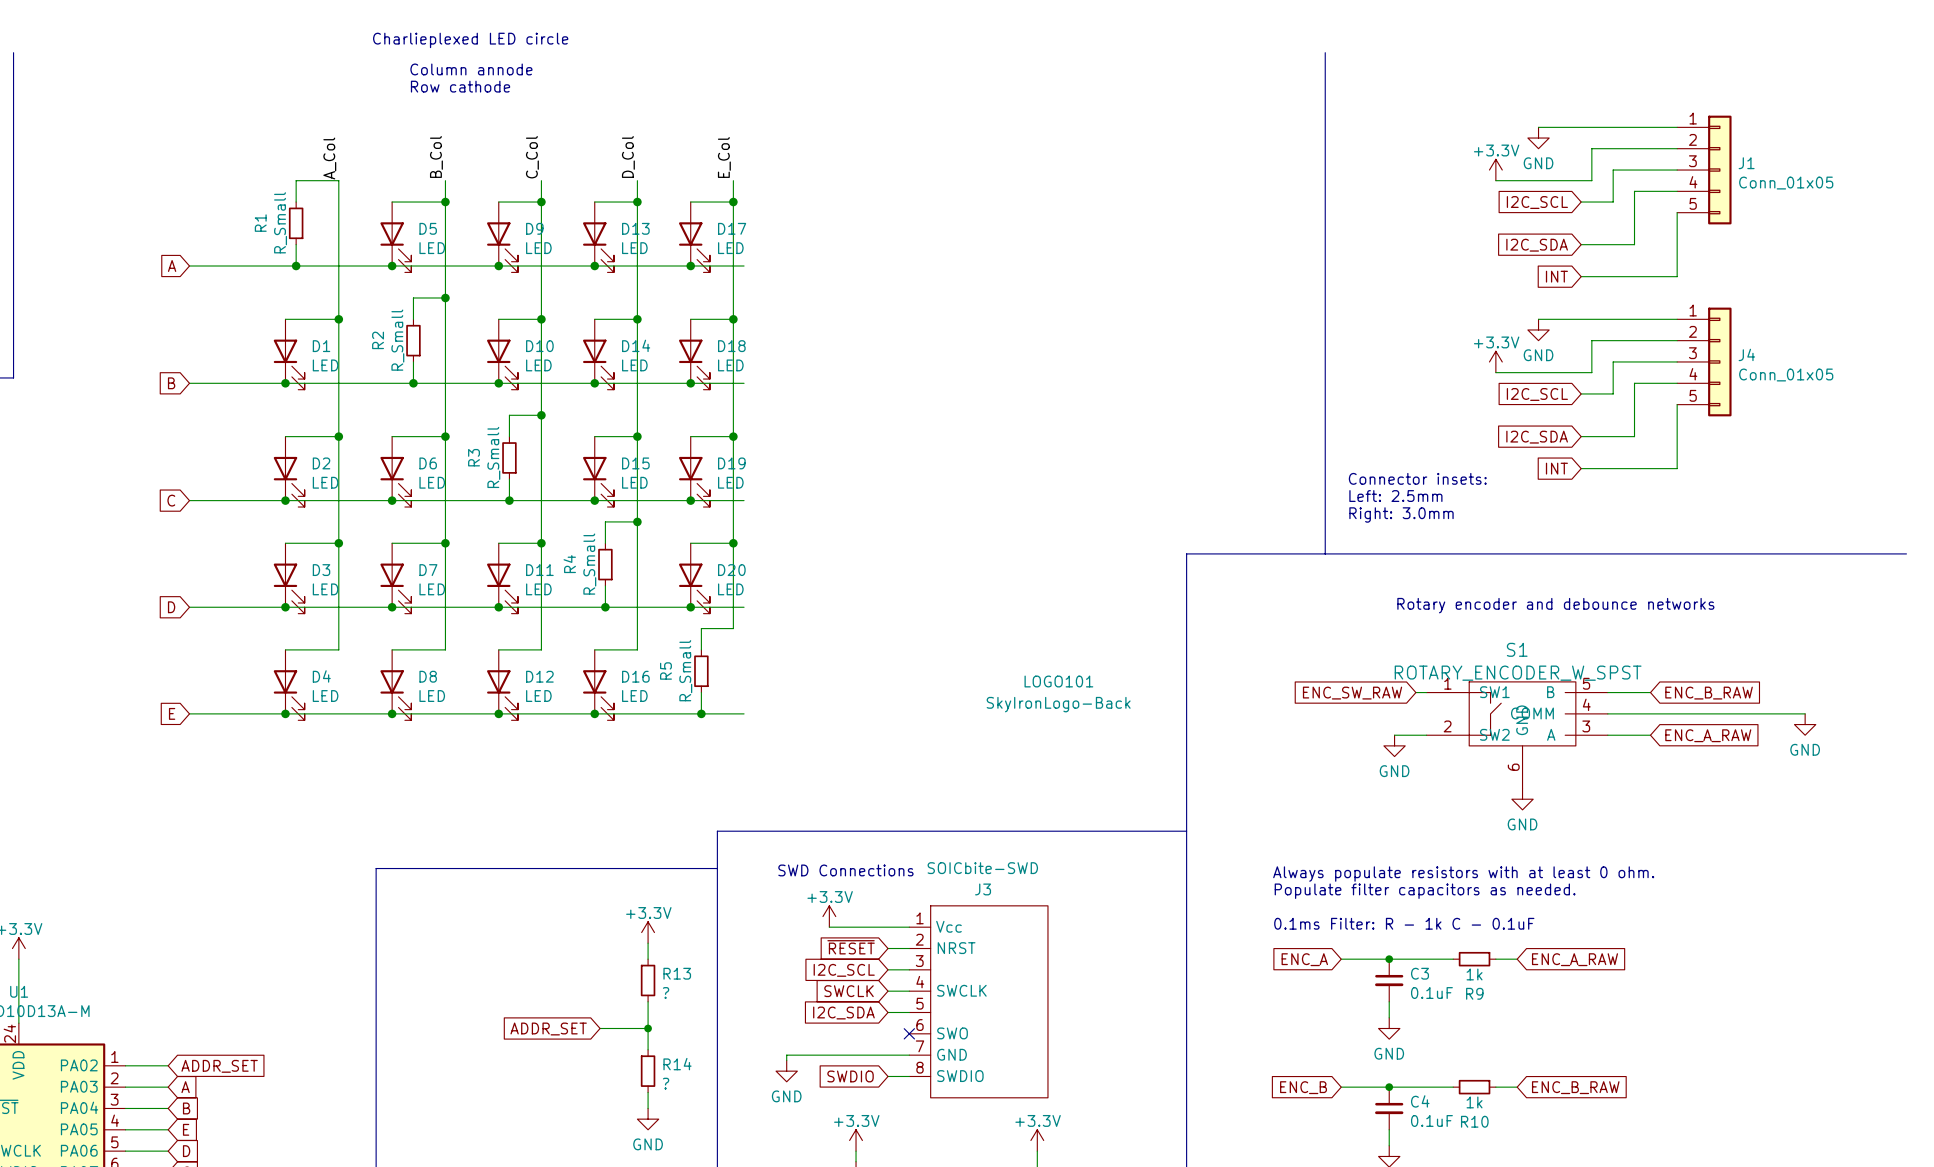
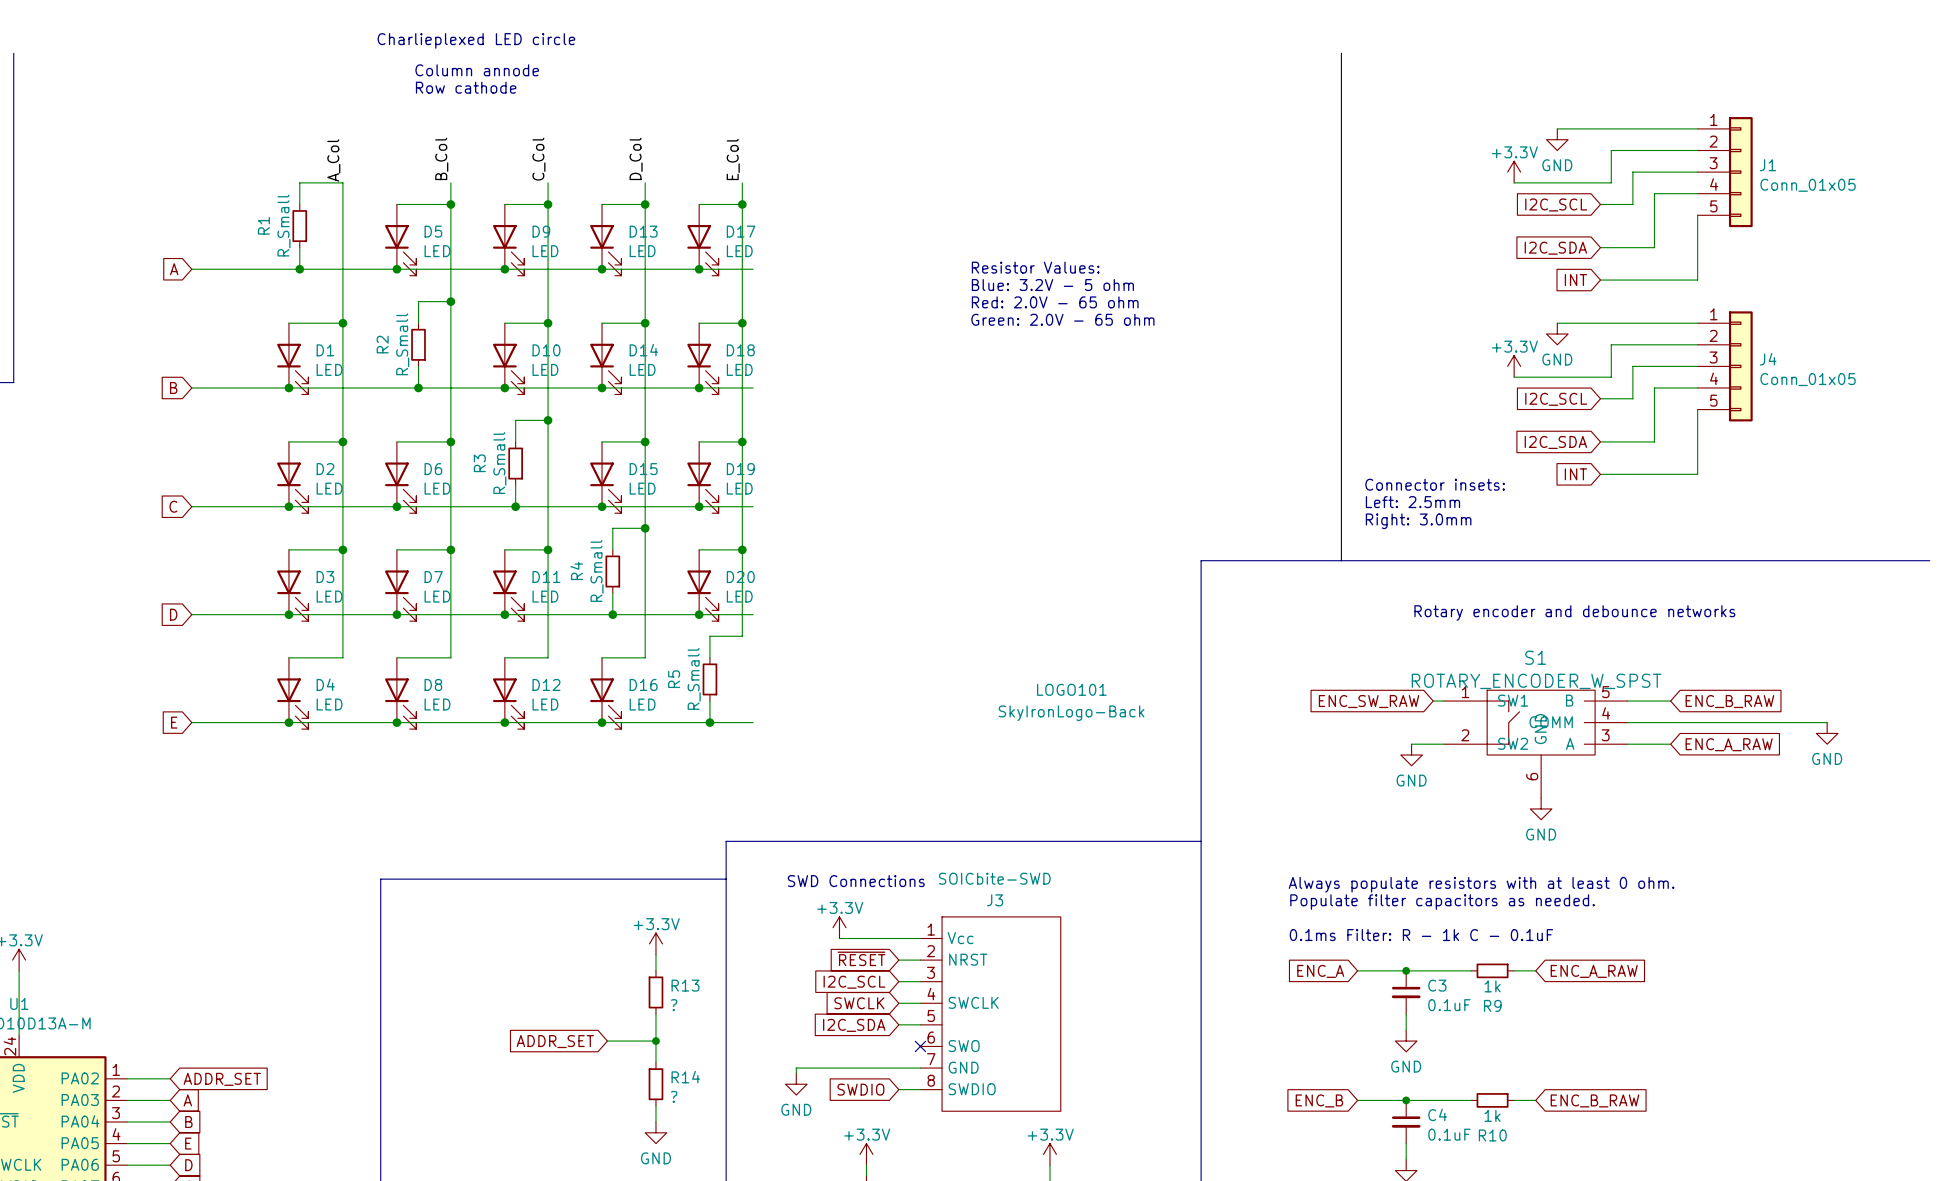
text: none -> Resistor Values: (1035, 267)
text: none -> Blue: 3.2V - 5 ohm (1052, 285)
text: none -> Red: 2.0V - 65 ohm (1055, 302)
text: none -> Green: 2.0V - 65 ohm (1062, 319)

